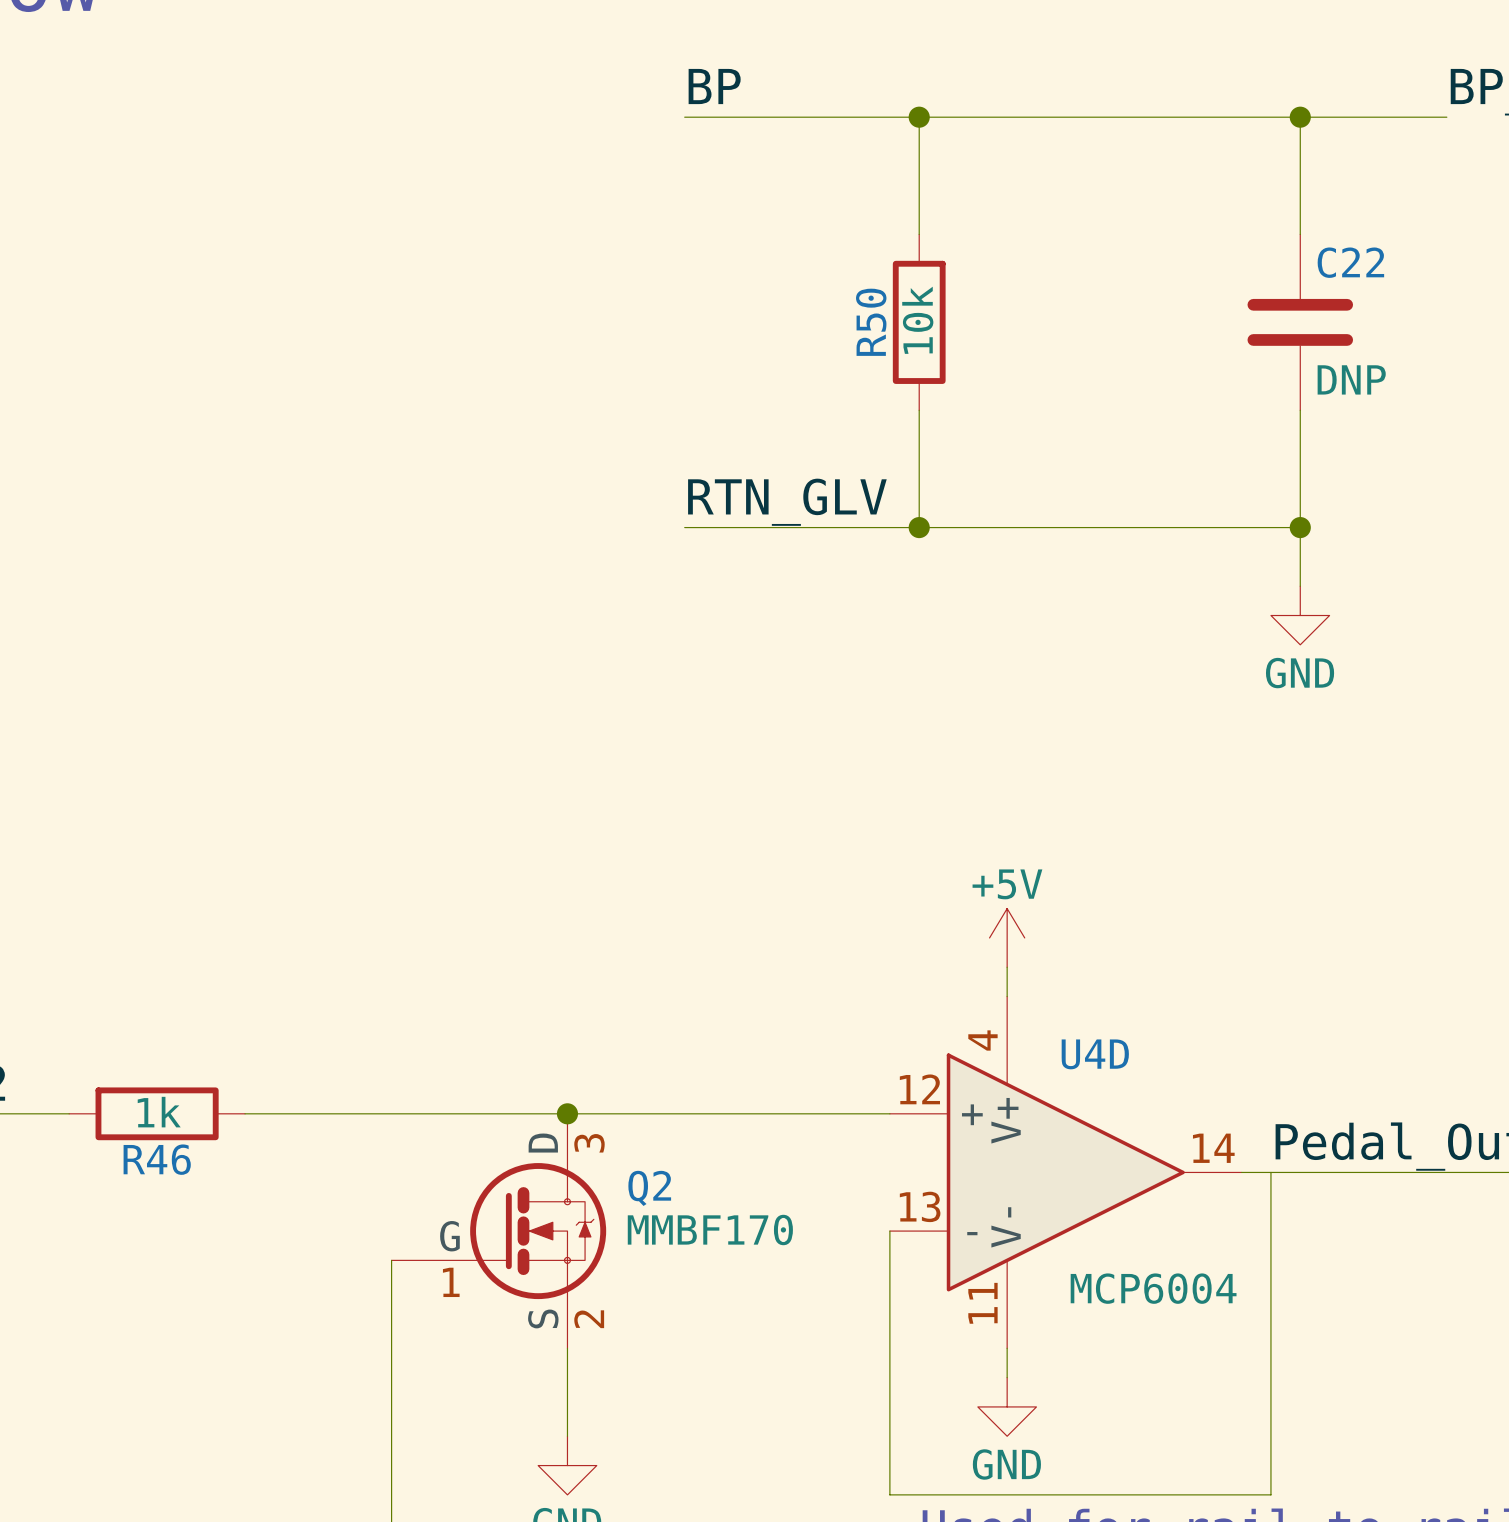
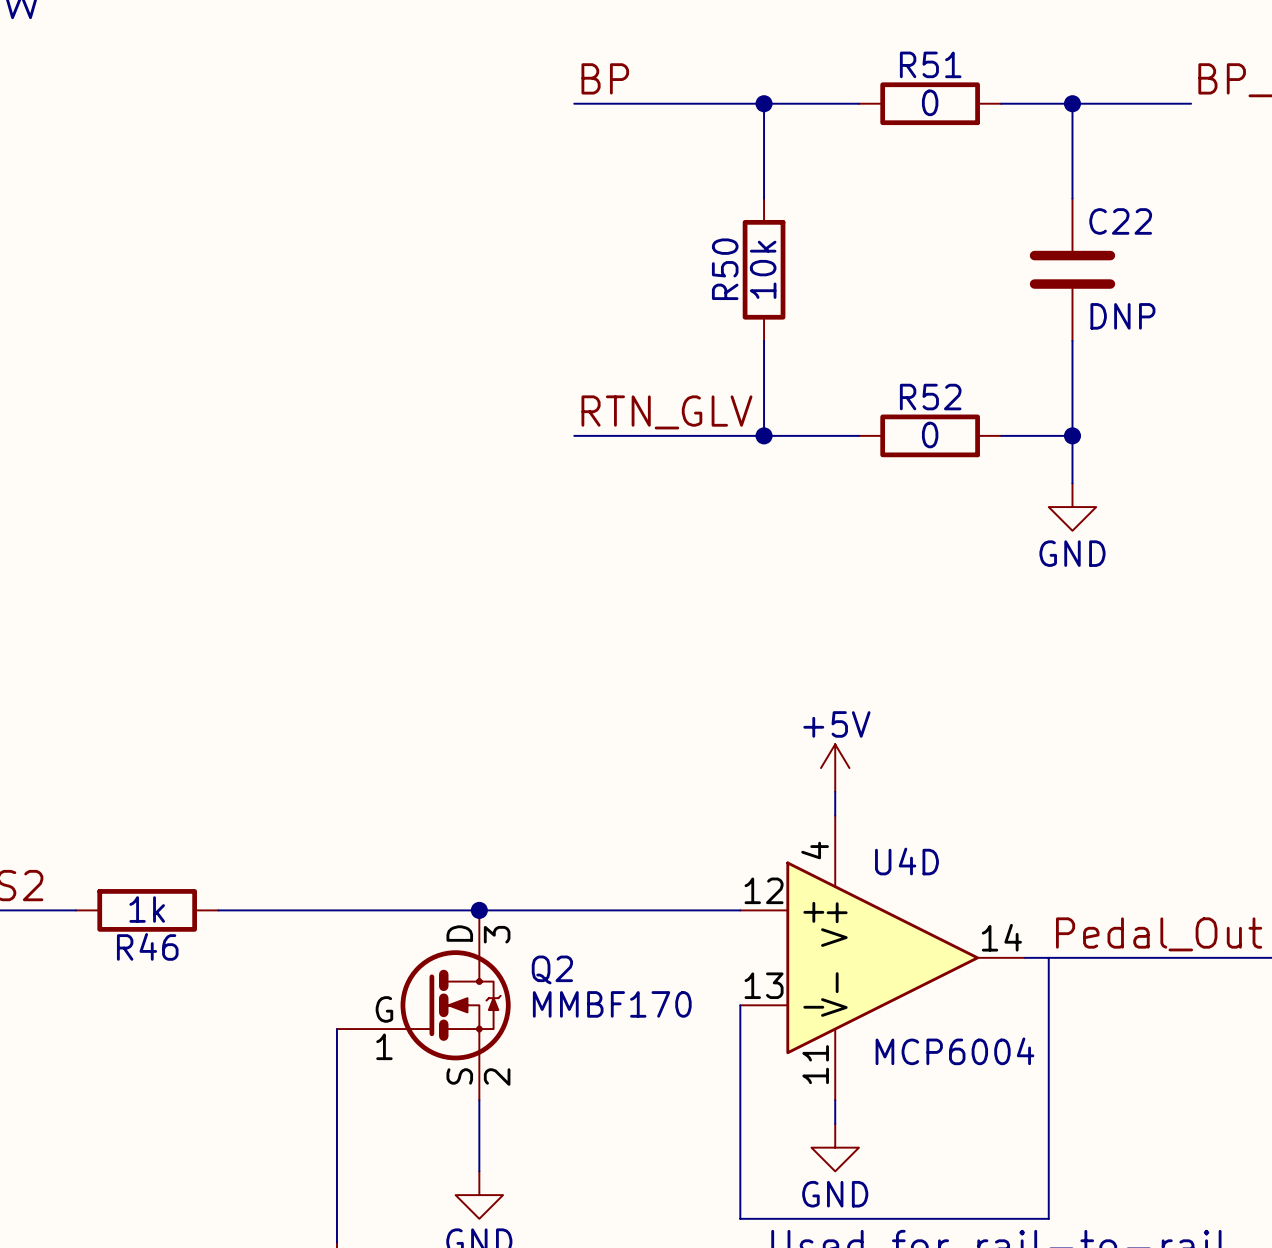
wire: (1036, 117) (1212, 117) -> none
R51: none -> 0 (930, 103)
wire: (1036, 527) (1212, 527) -> none
R52: none -> 0 (930, 435)

